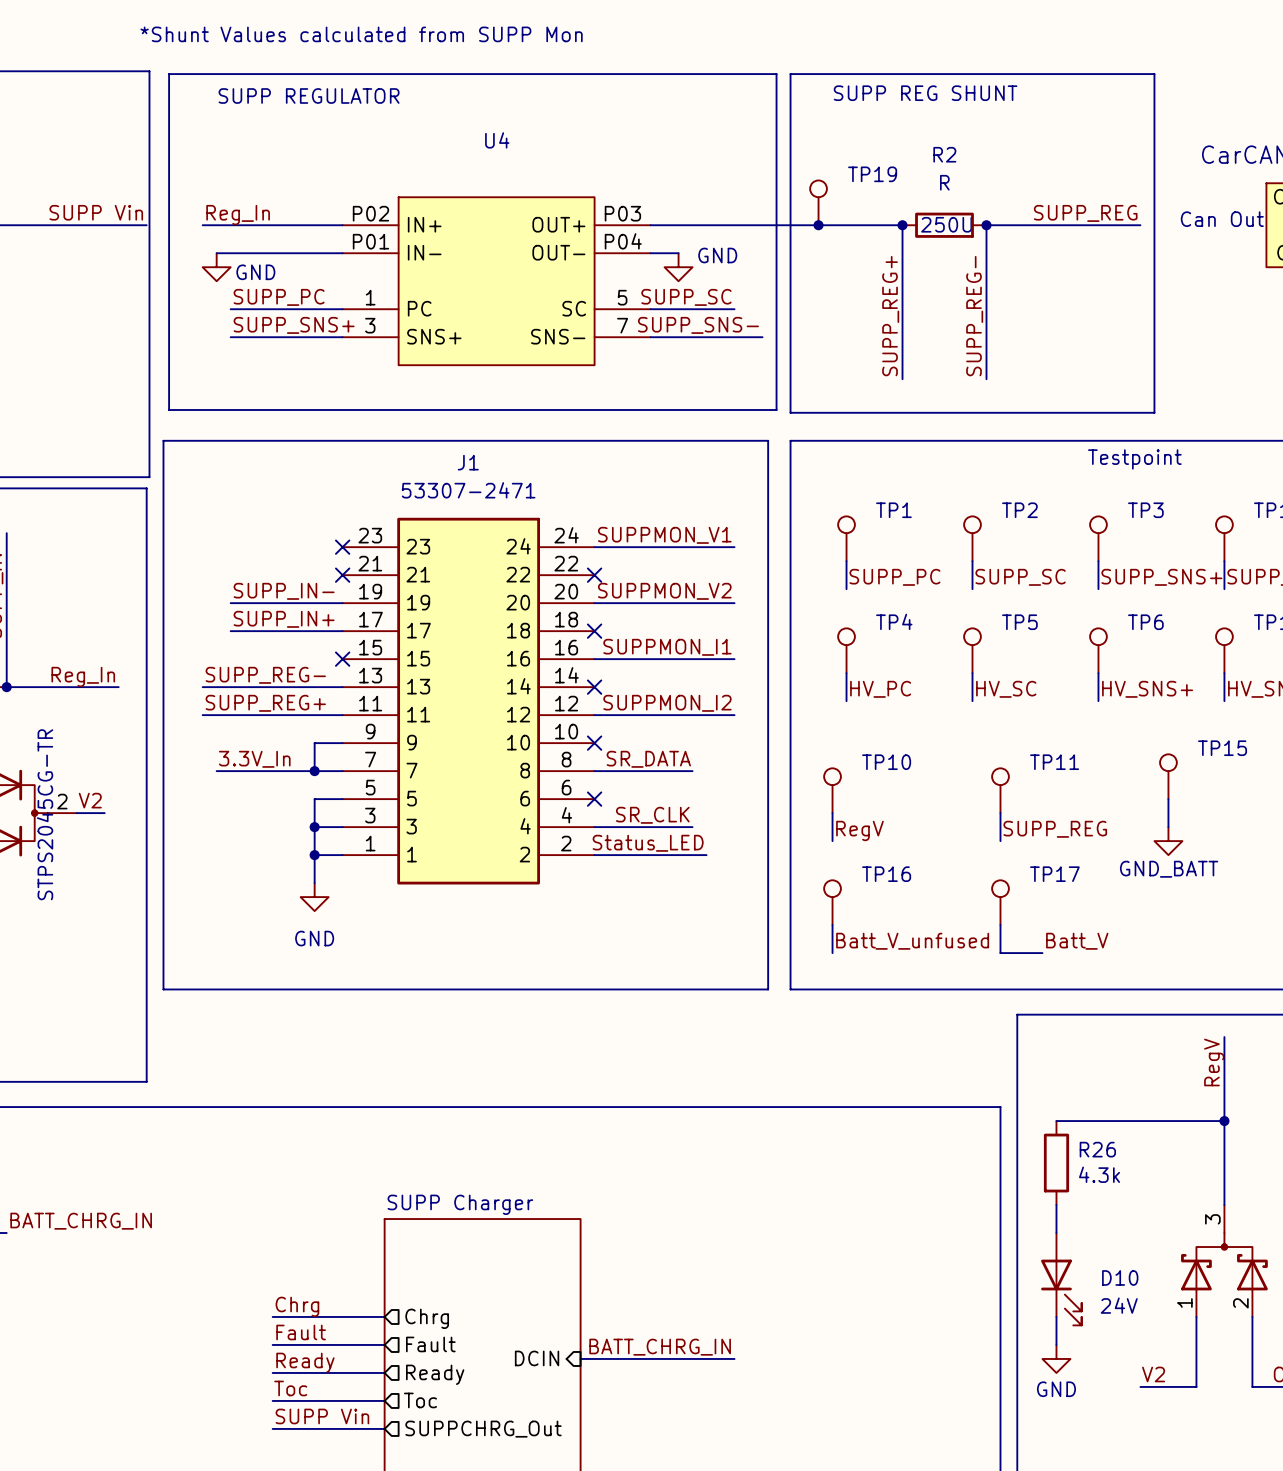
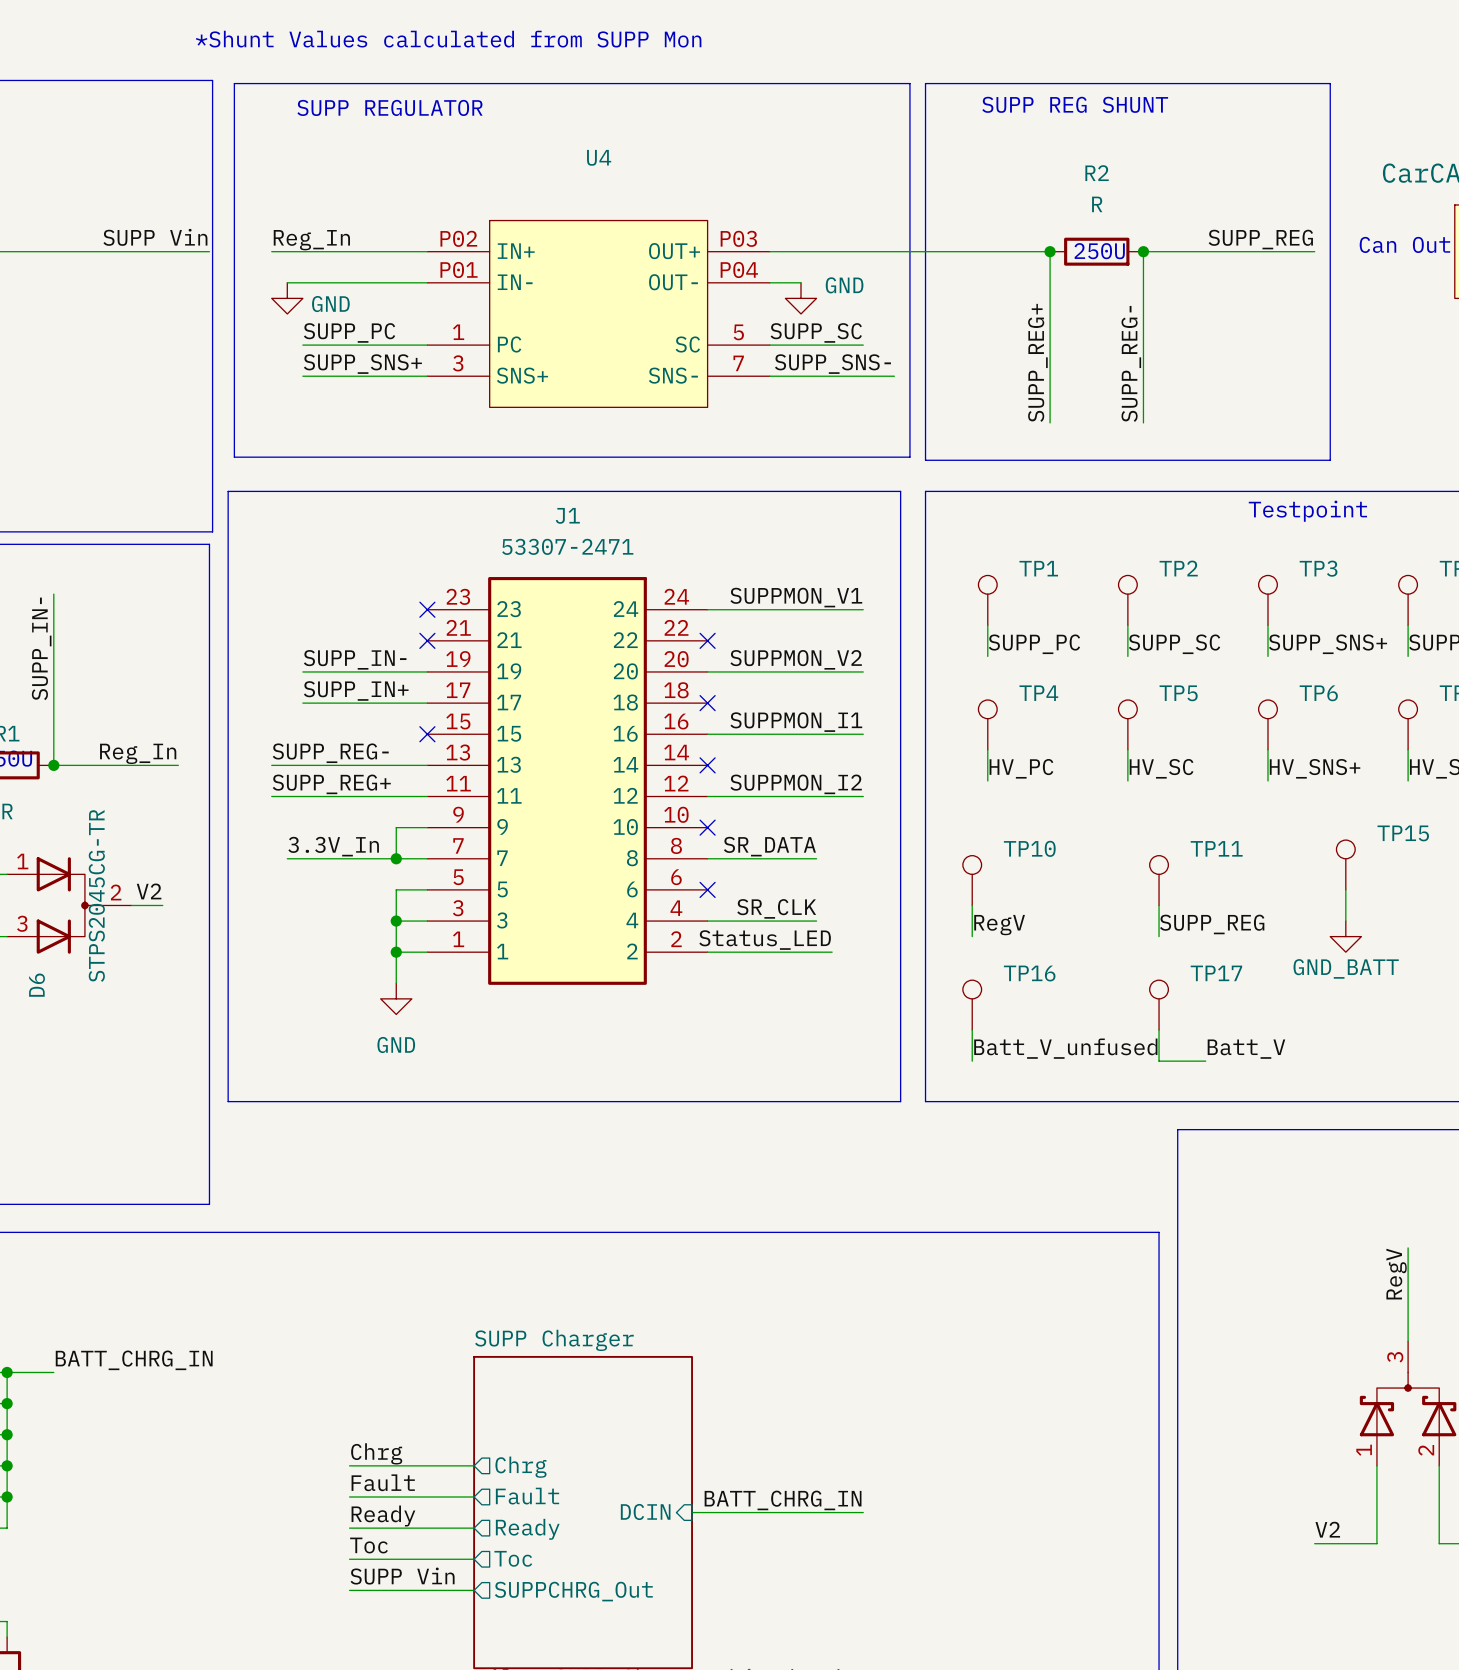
TP19: (818, 202) -> none
junction: (818, 225) -> none
wire: (1224, 1037) (1224, 1121) (1056, 1121) -> none
label position: RegV (1214, 1062) -> RegV (1396, 1274)
junction: (1224, 1121) -> none
R26: 4.3k (1056, 1163) -> none
wire: (1056, 1205) (1056, 1233) -> none
D10: 24V (1061, 1279) -> none
wire: (1056, 1316) (1056, 1344) -> none
power symbol: GND (1056, 1358) -> none

